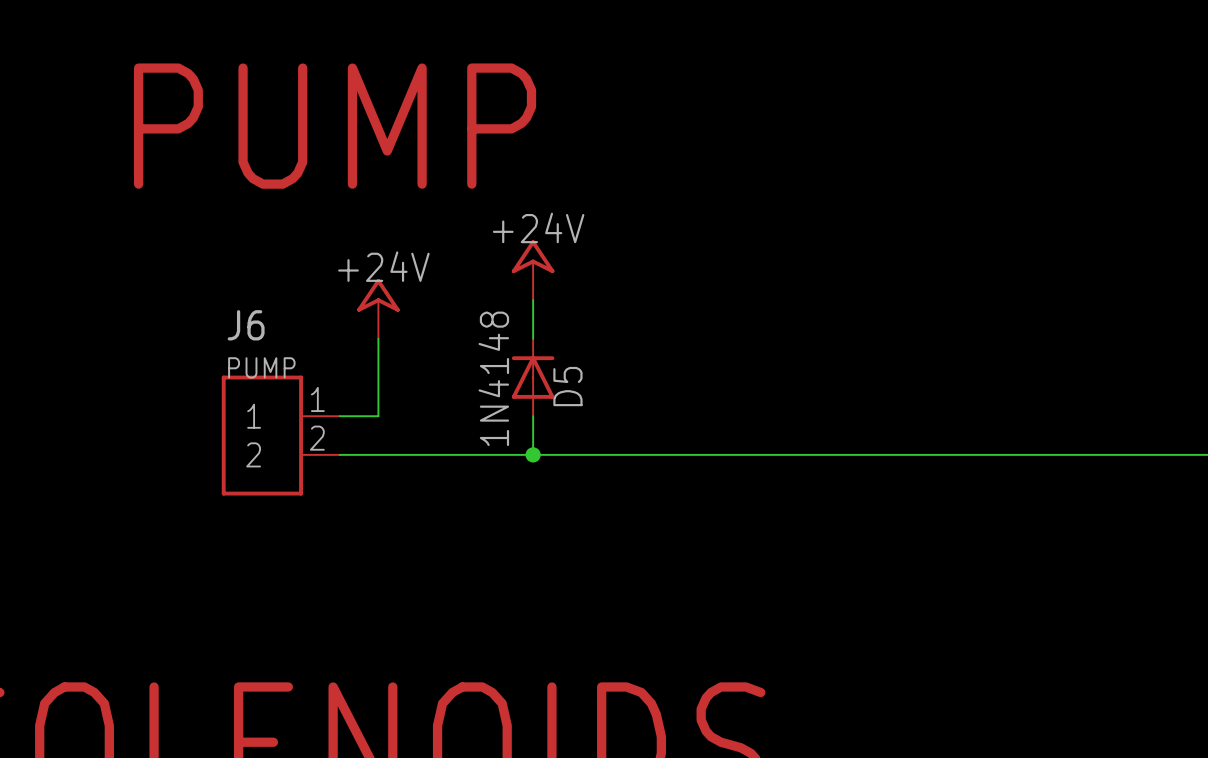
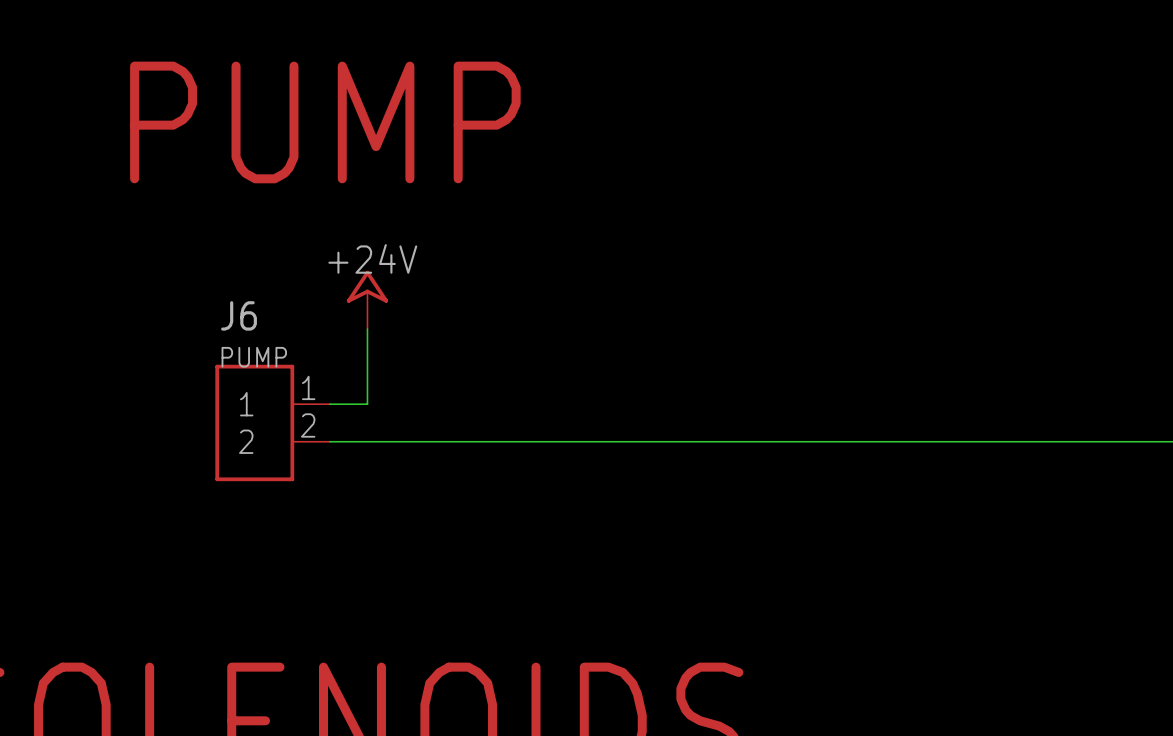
power symbol: +24V (533, 270) -> none
wire: (533, 300) (533, 338) -> none
D5: 1N4148 (533, 377) -> none
wire: (533, 416) (533, 454) -> none
junction: (533, 454) -> none

